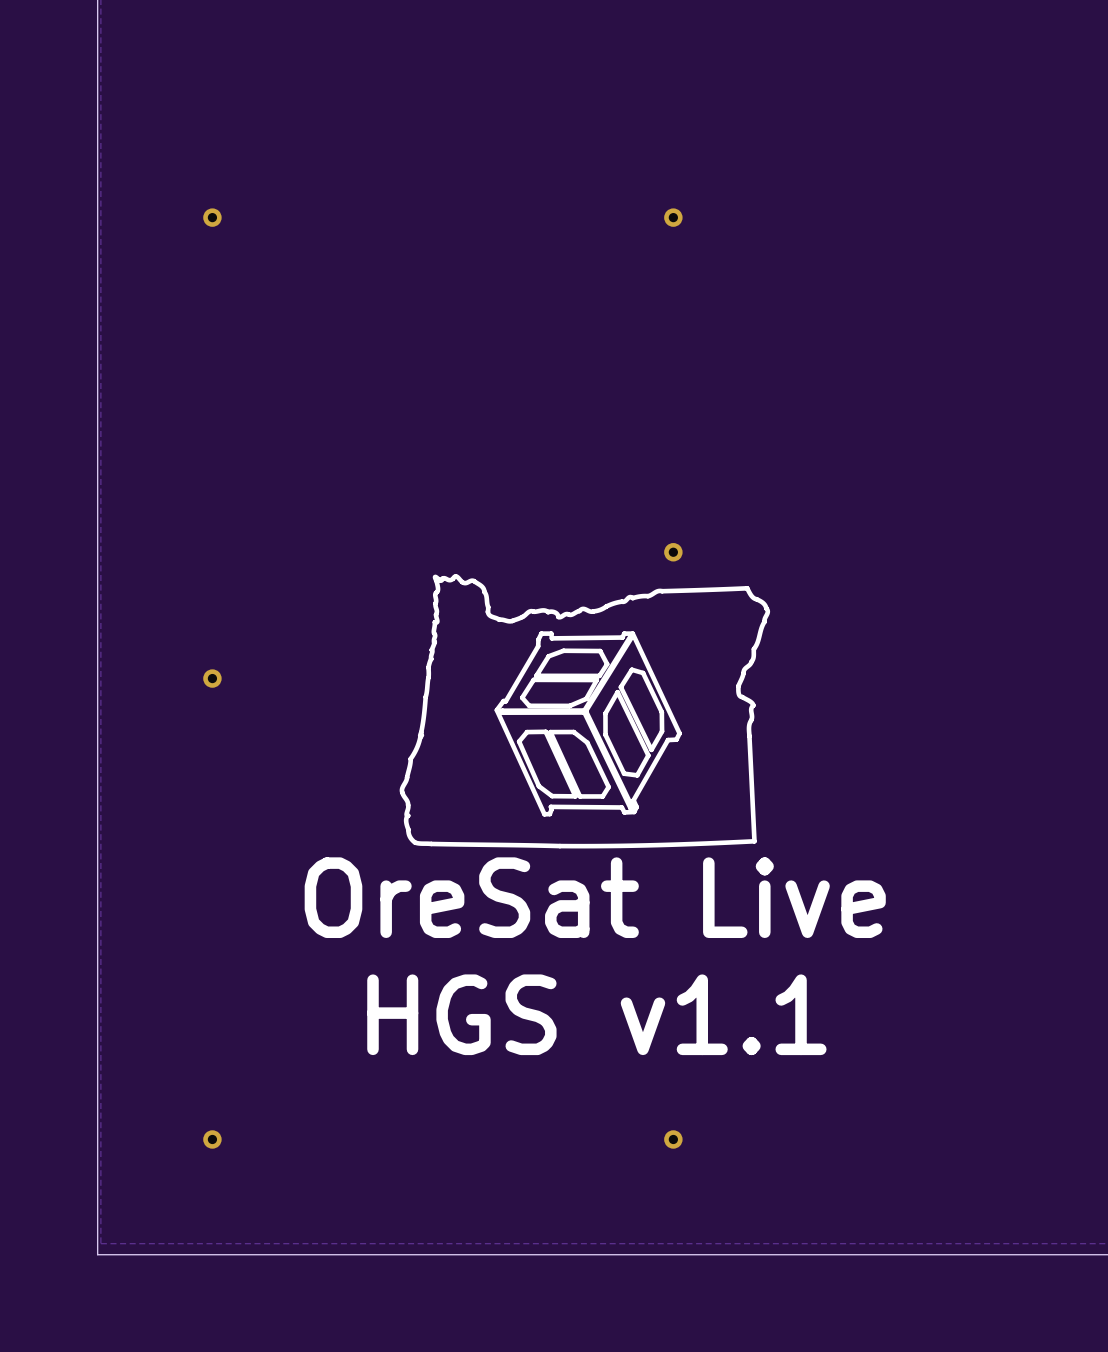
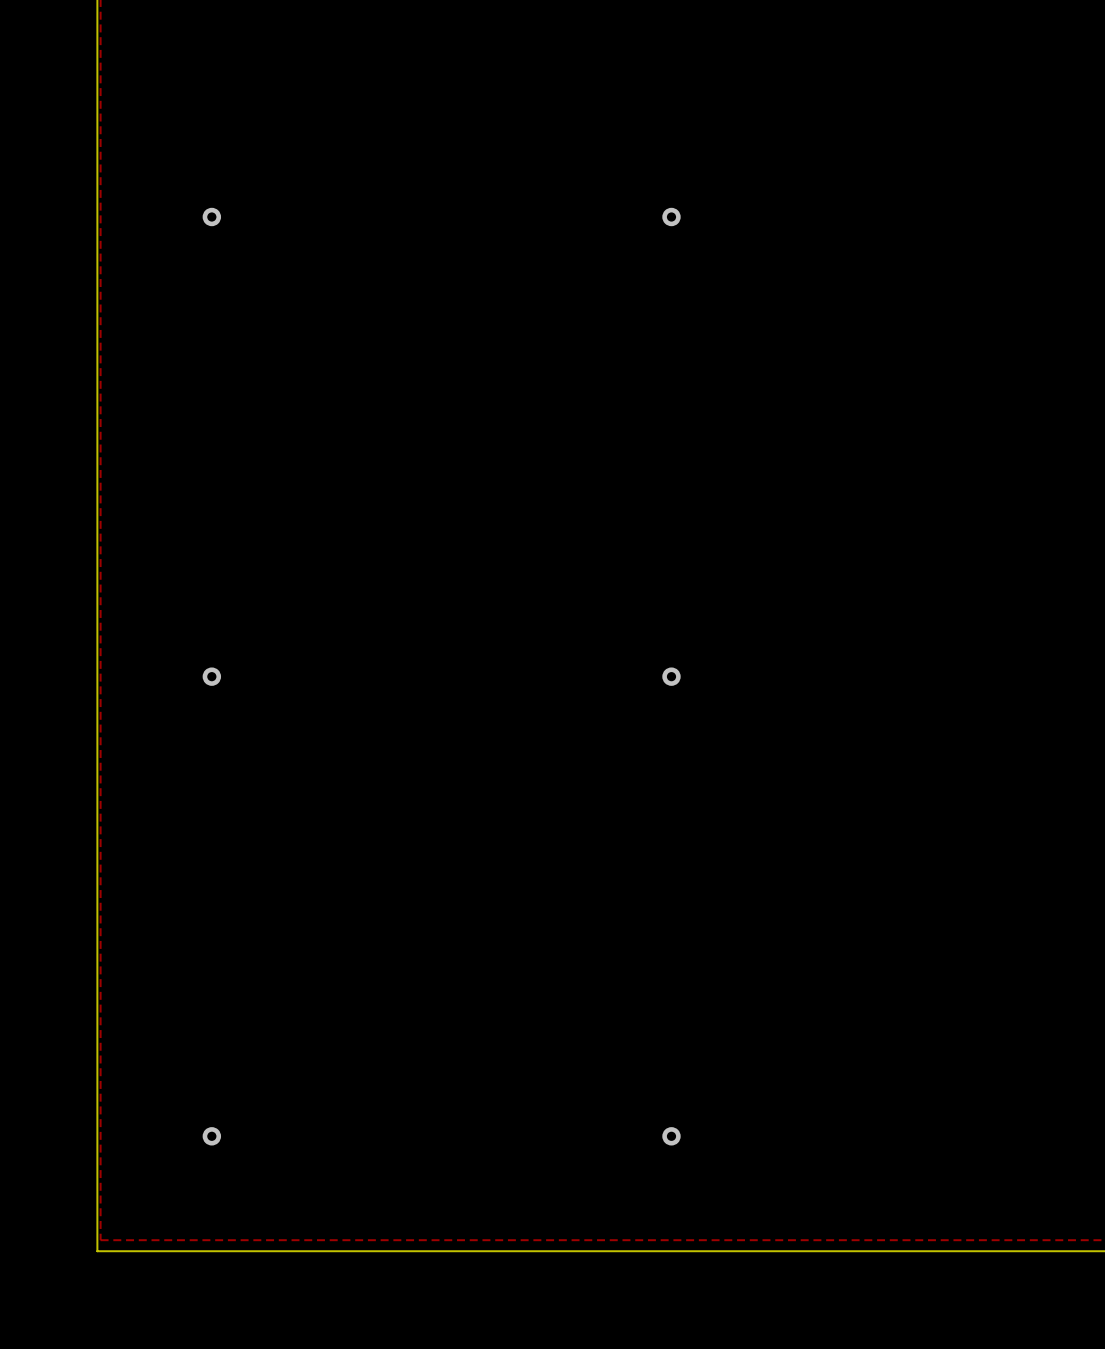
via position: (673, 552) -> (671, 676)
drawing: [399, 574, 771, 849] -> none

